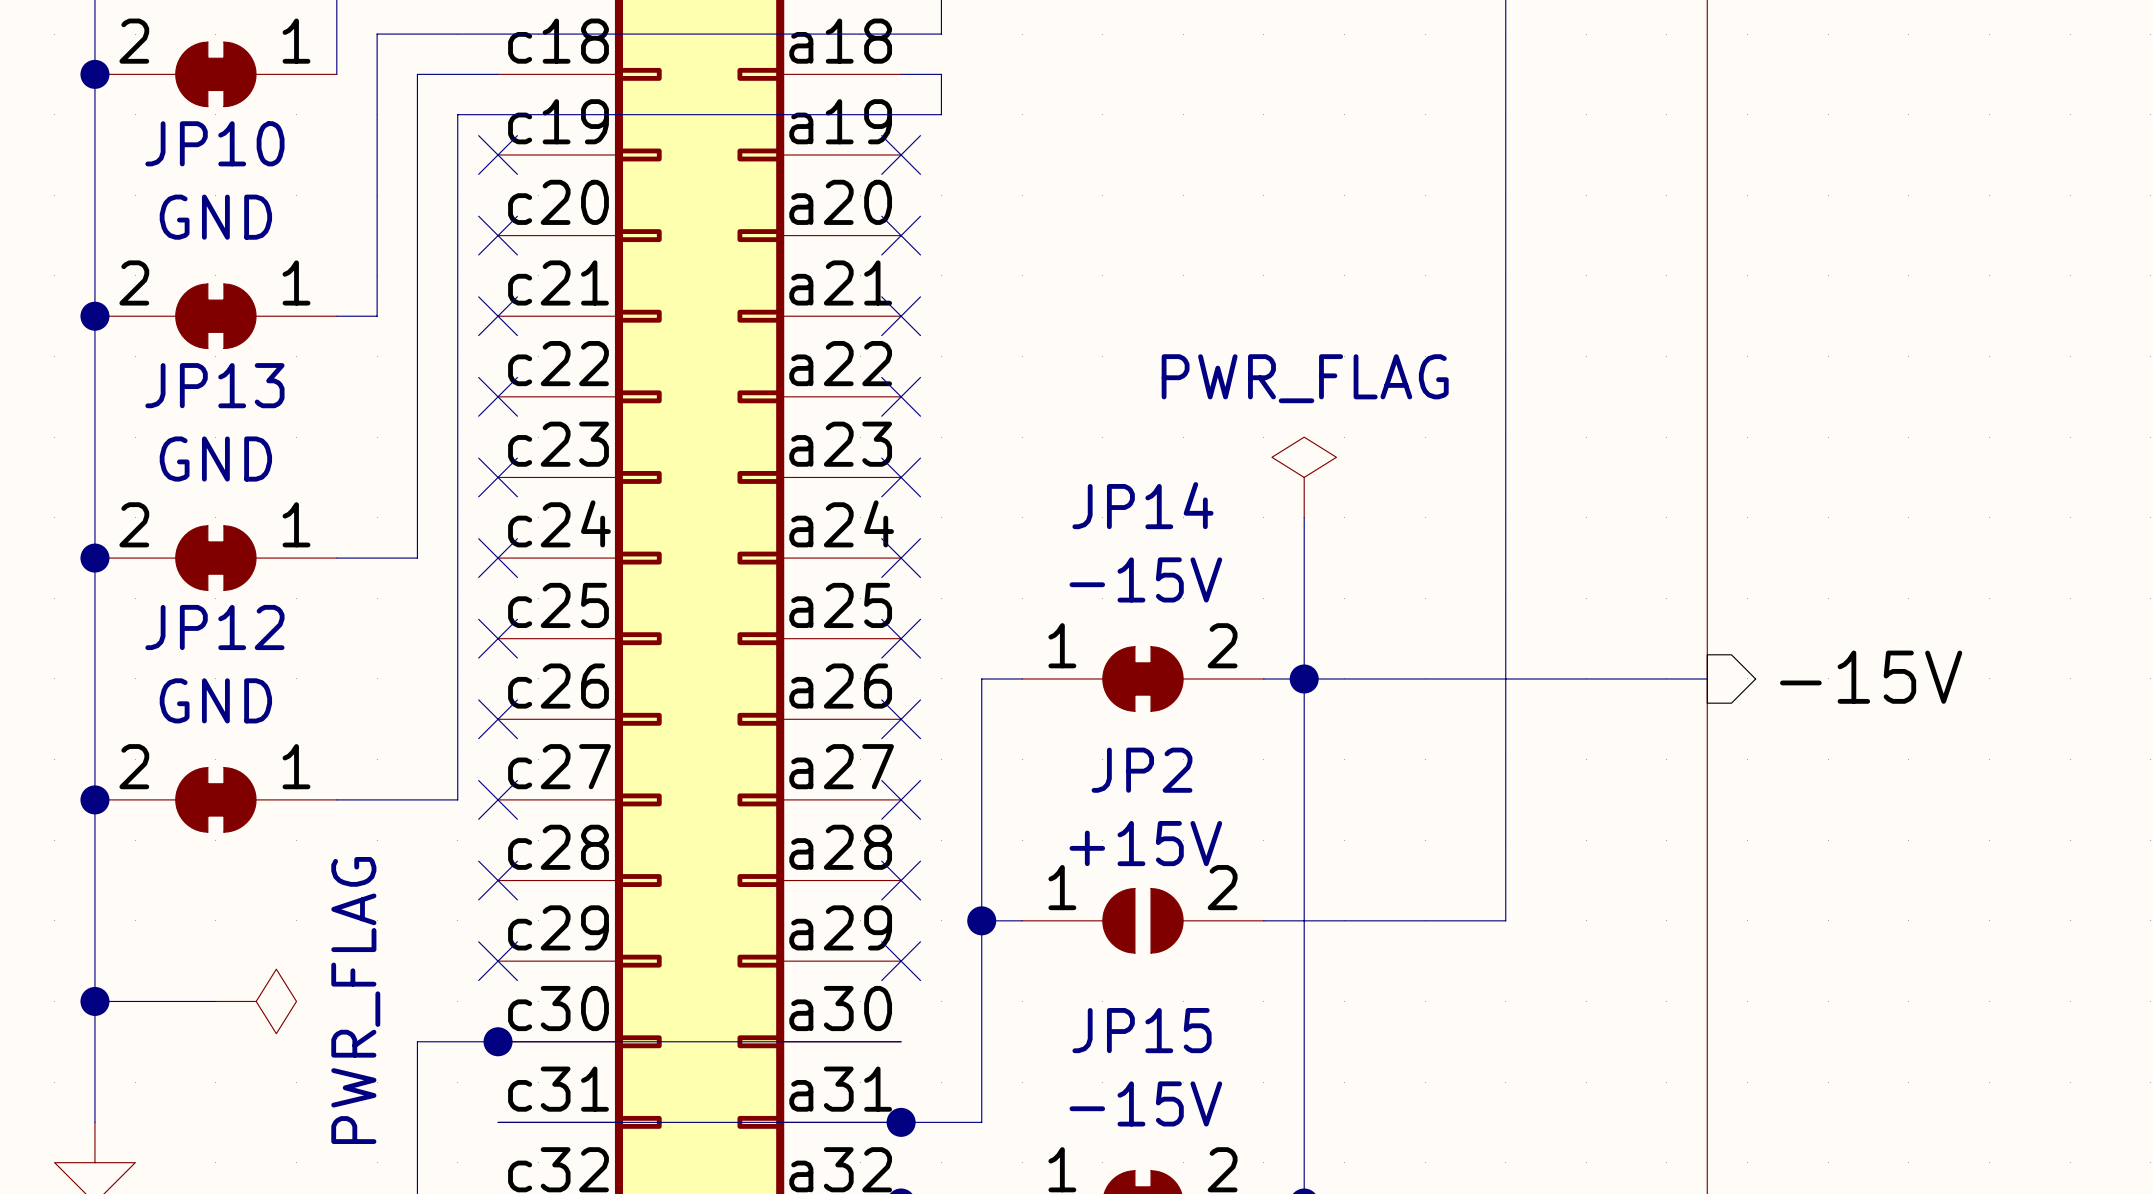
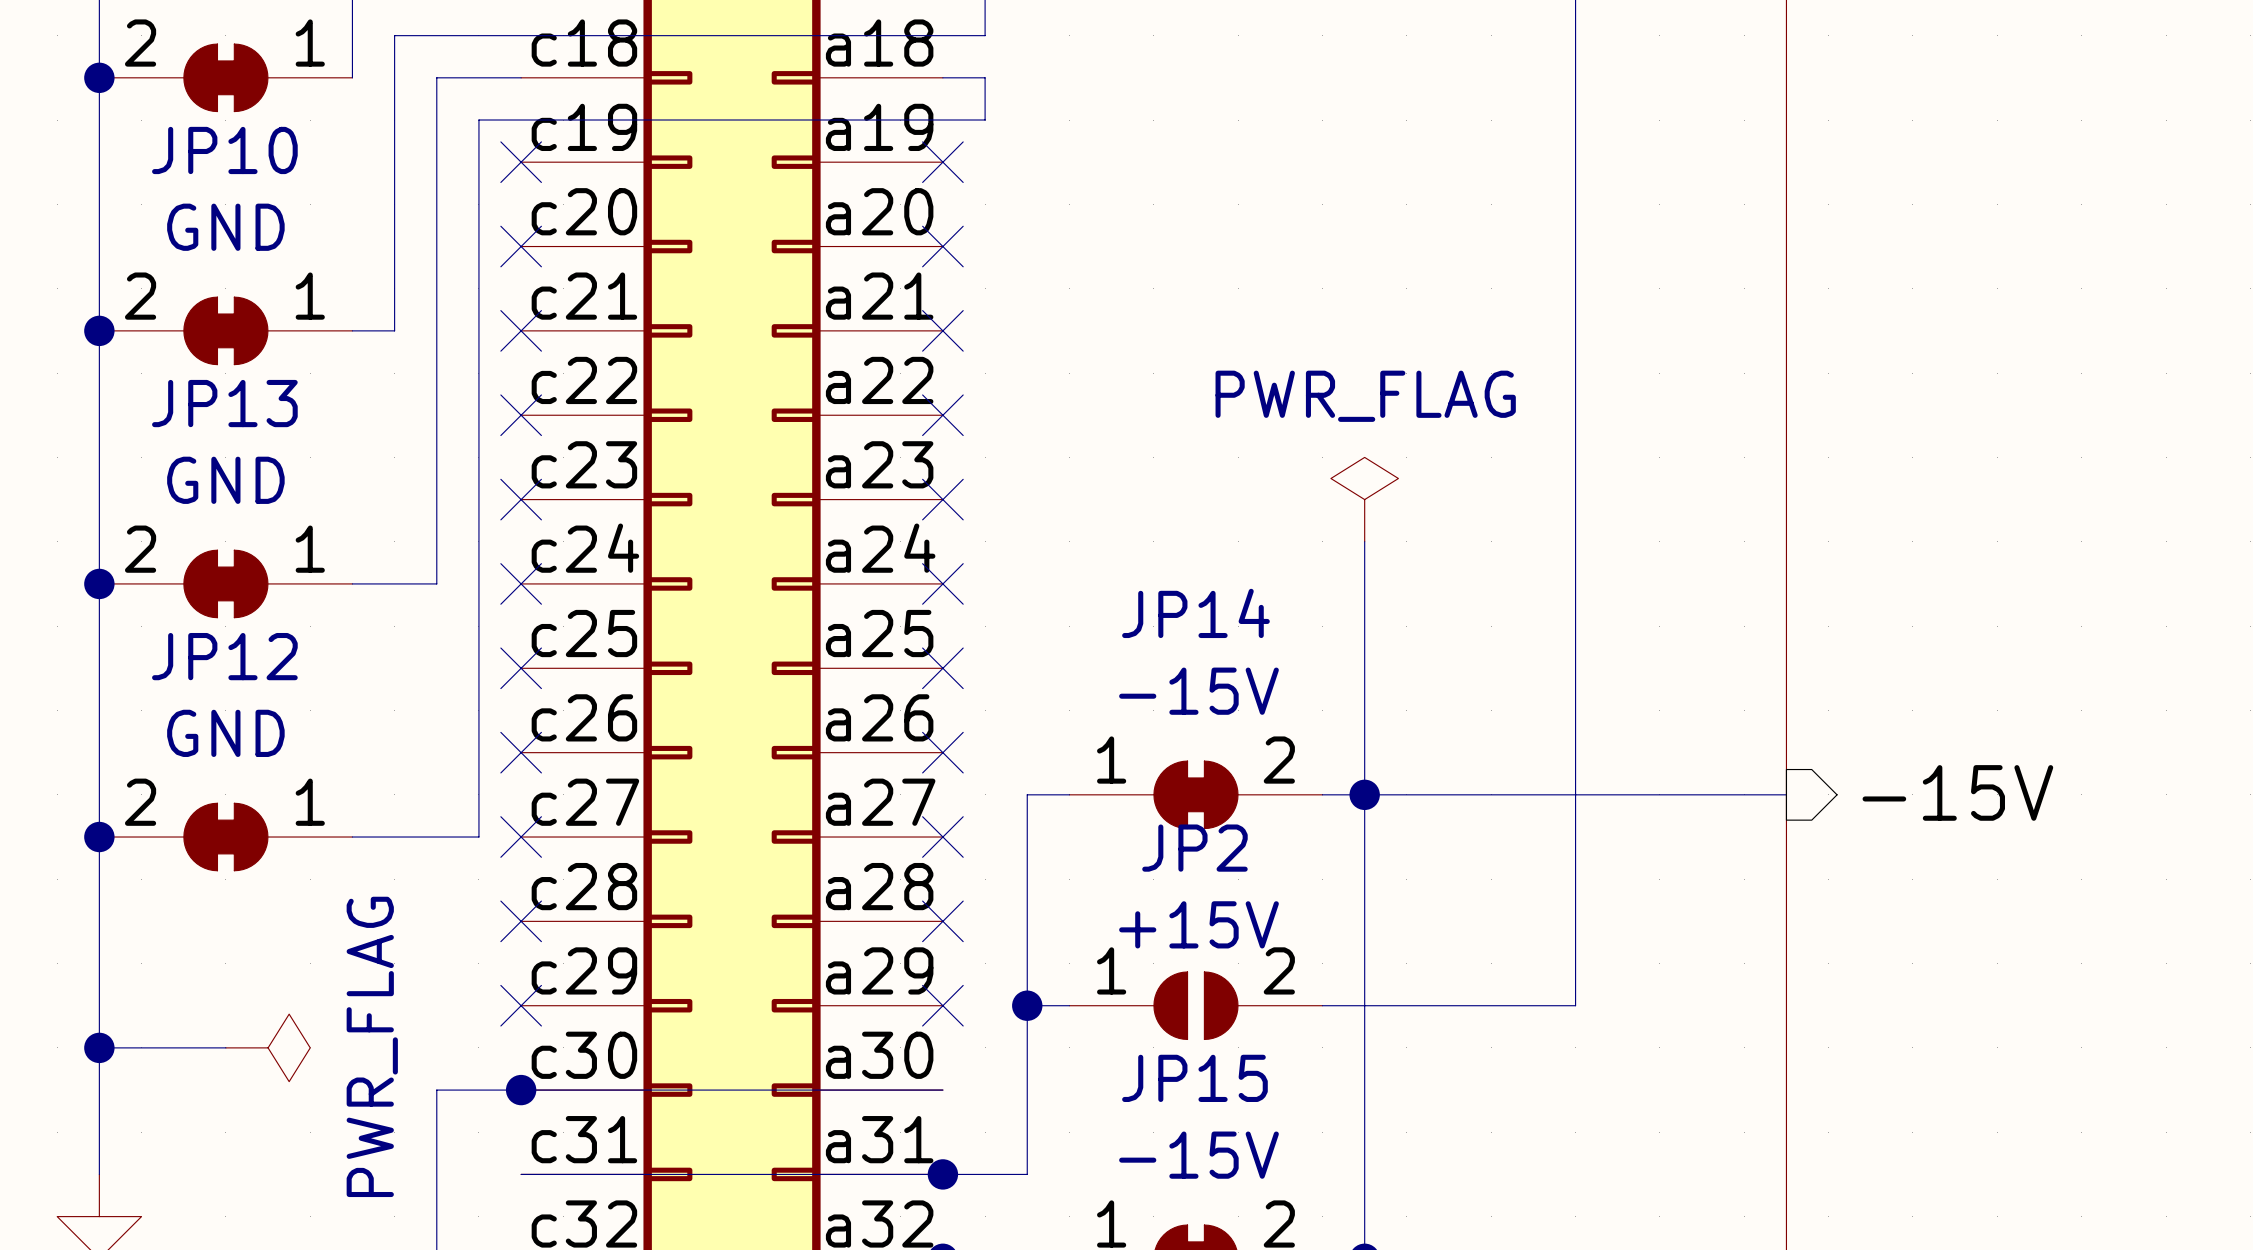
sheet pin position: -15V (1871, 677) -> -15V (1957, 792)
wire: (1022, 678) (981, 678) (981, 759) -> (1069, 794) (1027, 794)
JP14 position: (1142, 678) -> (1195, 794)
wire: (1263, 678) (1707, 678) -> (1322, 794) (1786, 794)
junction position: (1304, 678) -> (1364, 794)
wire: (981, 920) (1022, 920) -> (1027, 1005) (1069, 1005)
junction position: (981, 920) -> (1027, 1005)
JP2 position: (1142, 920) -> (1195, 1005)
wire: (1263, 920) (1505, 920) -> (1322, 1005) (1575, 1005) (1575, 963)

